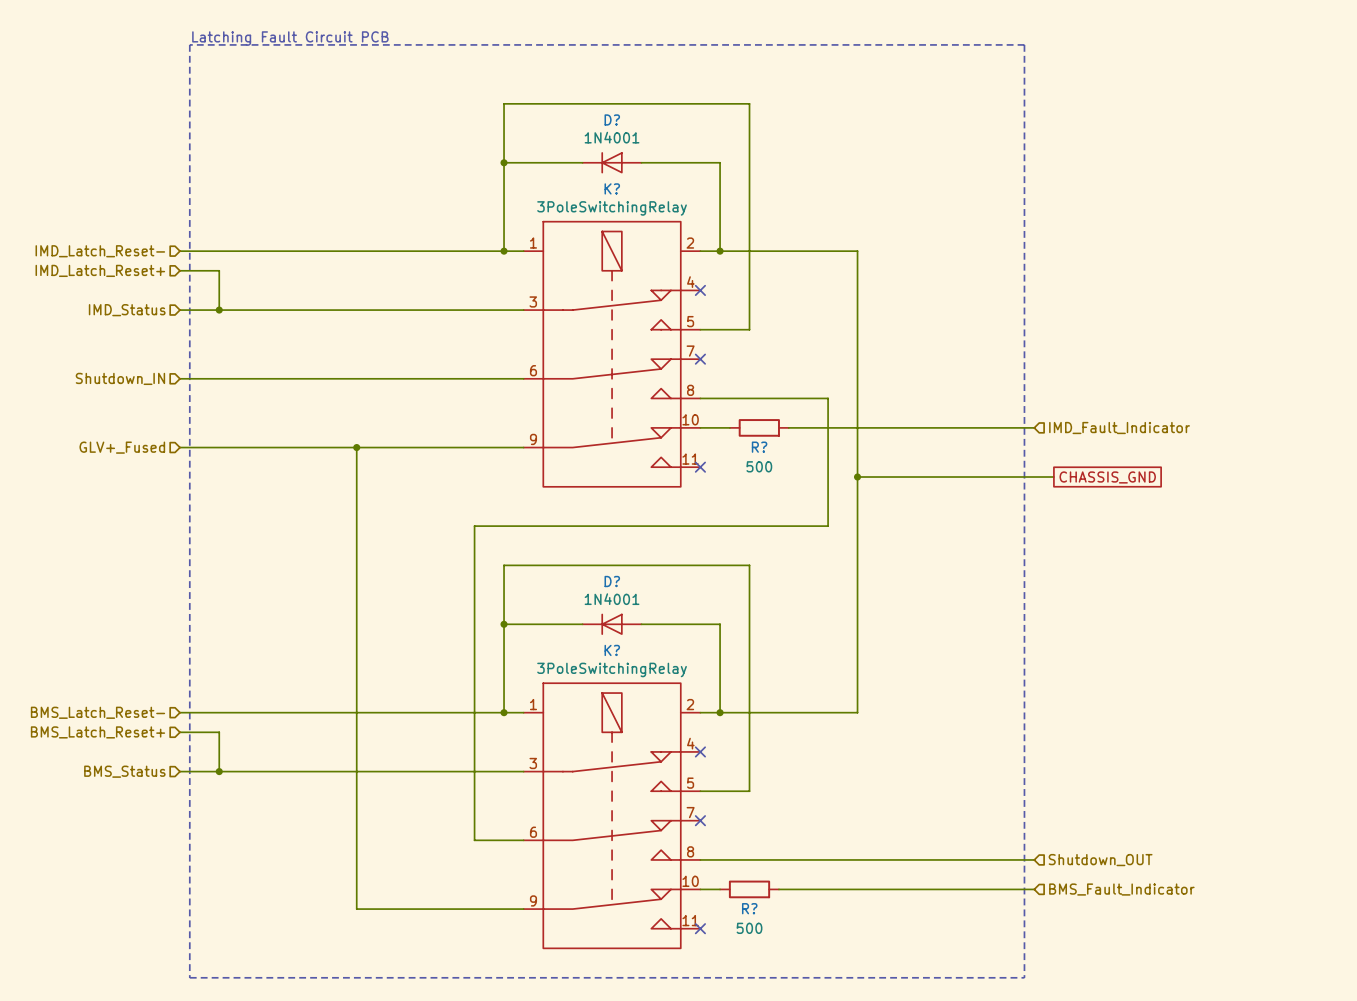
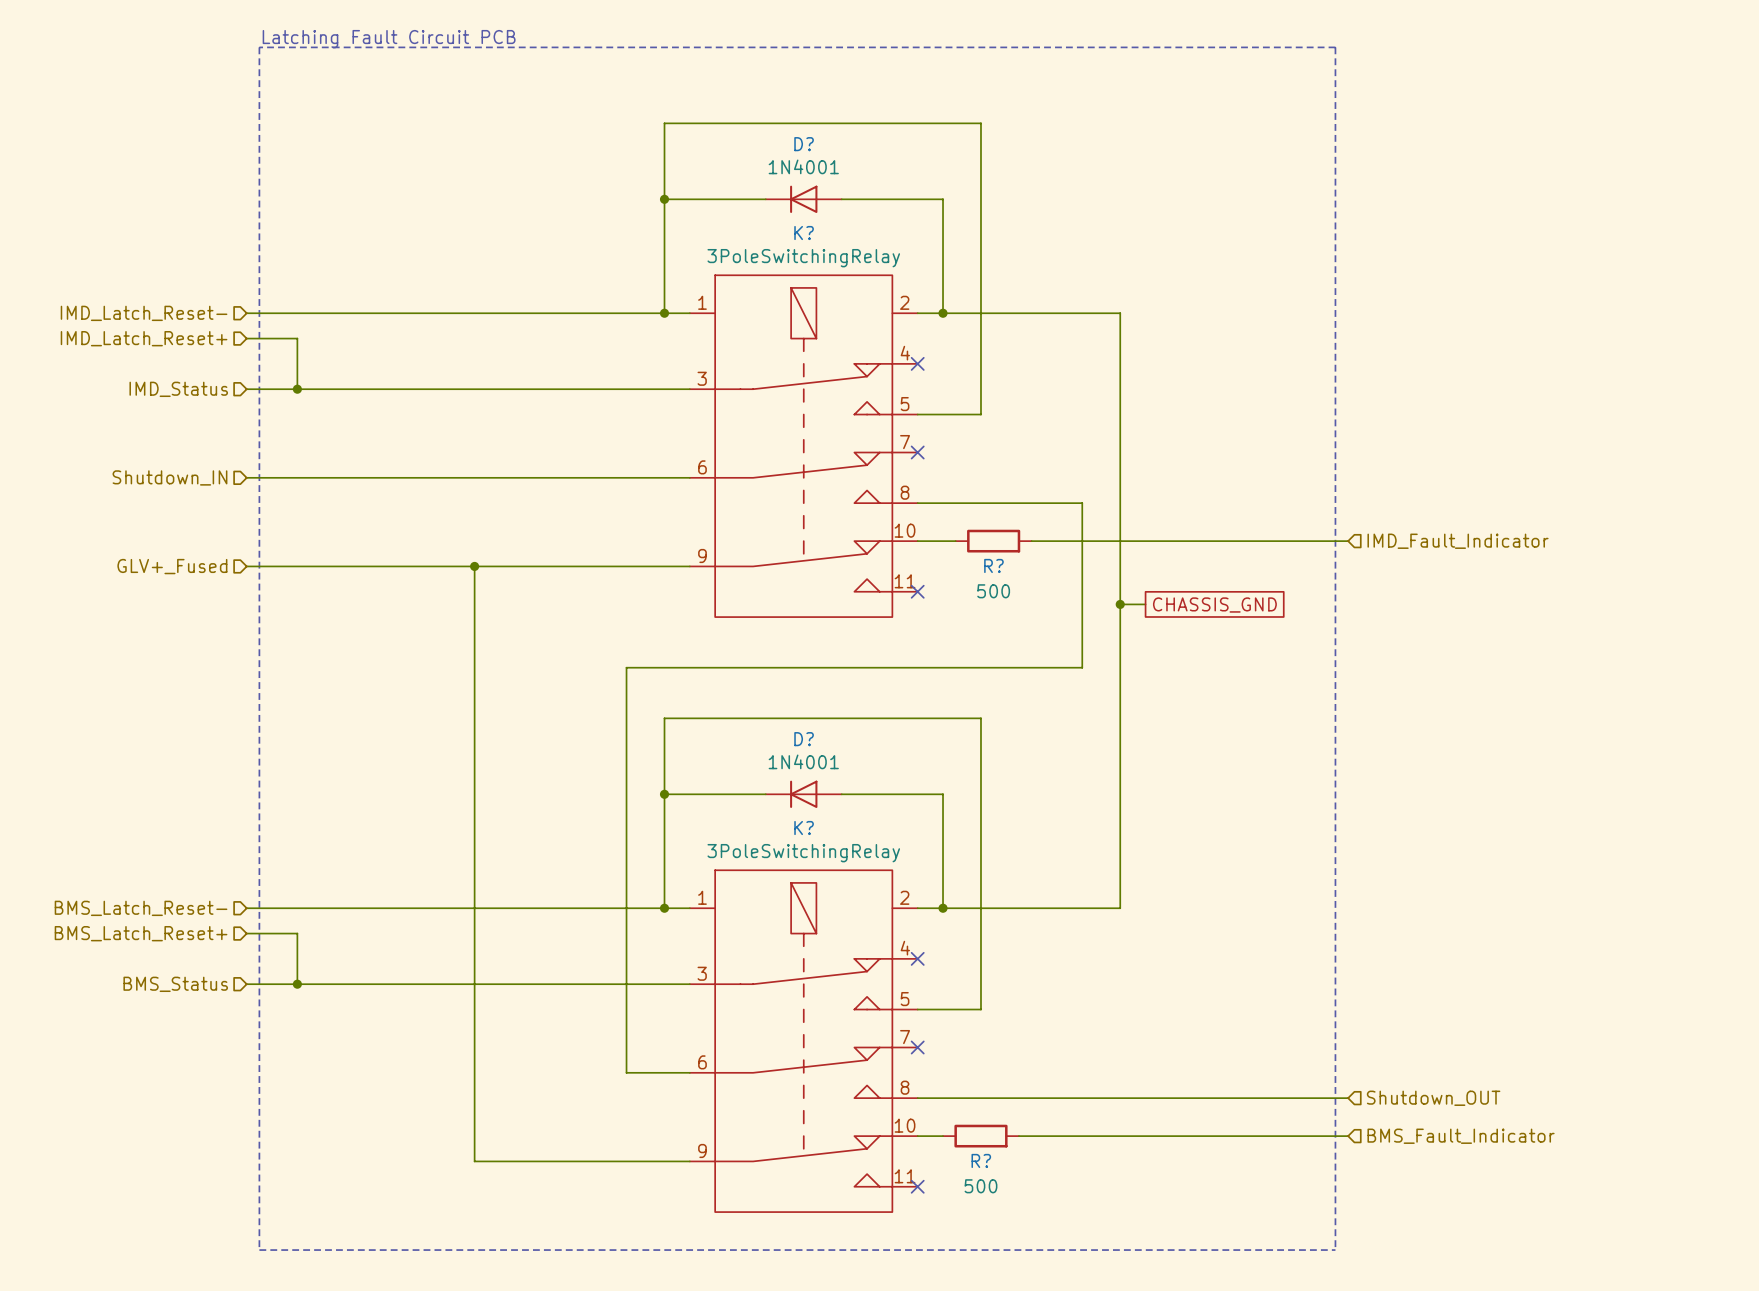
wire: (877, 477) (1053, 477) -> none
global label position: CHASSIS_GND (1107, 477) -> CHASSIS_GND (1214, 605)

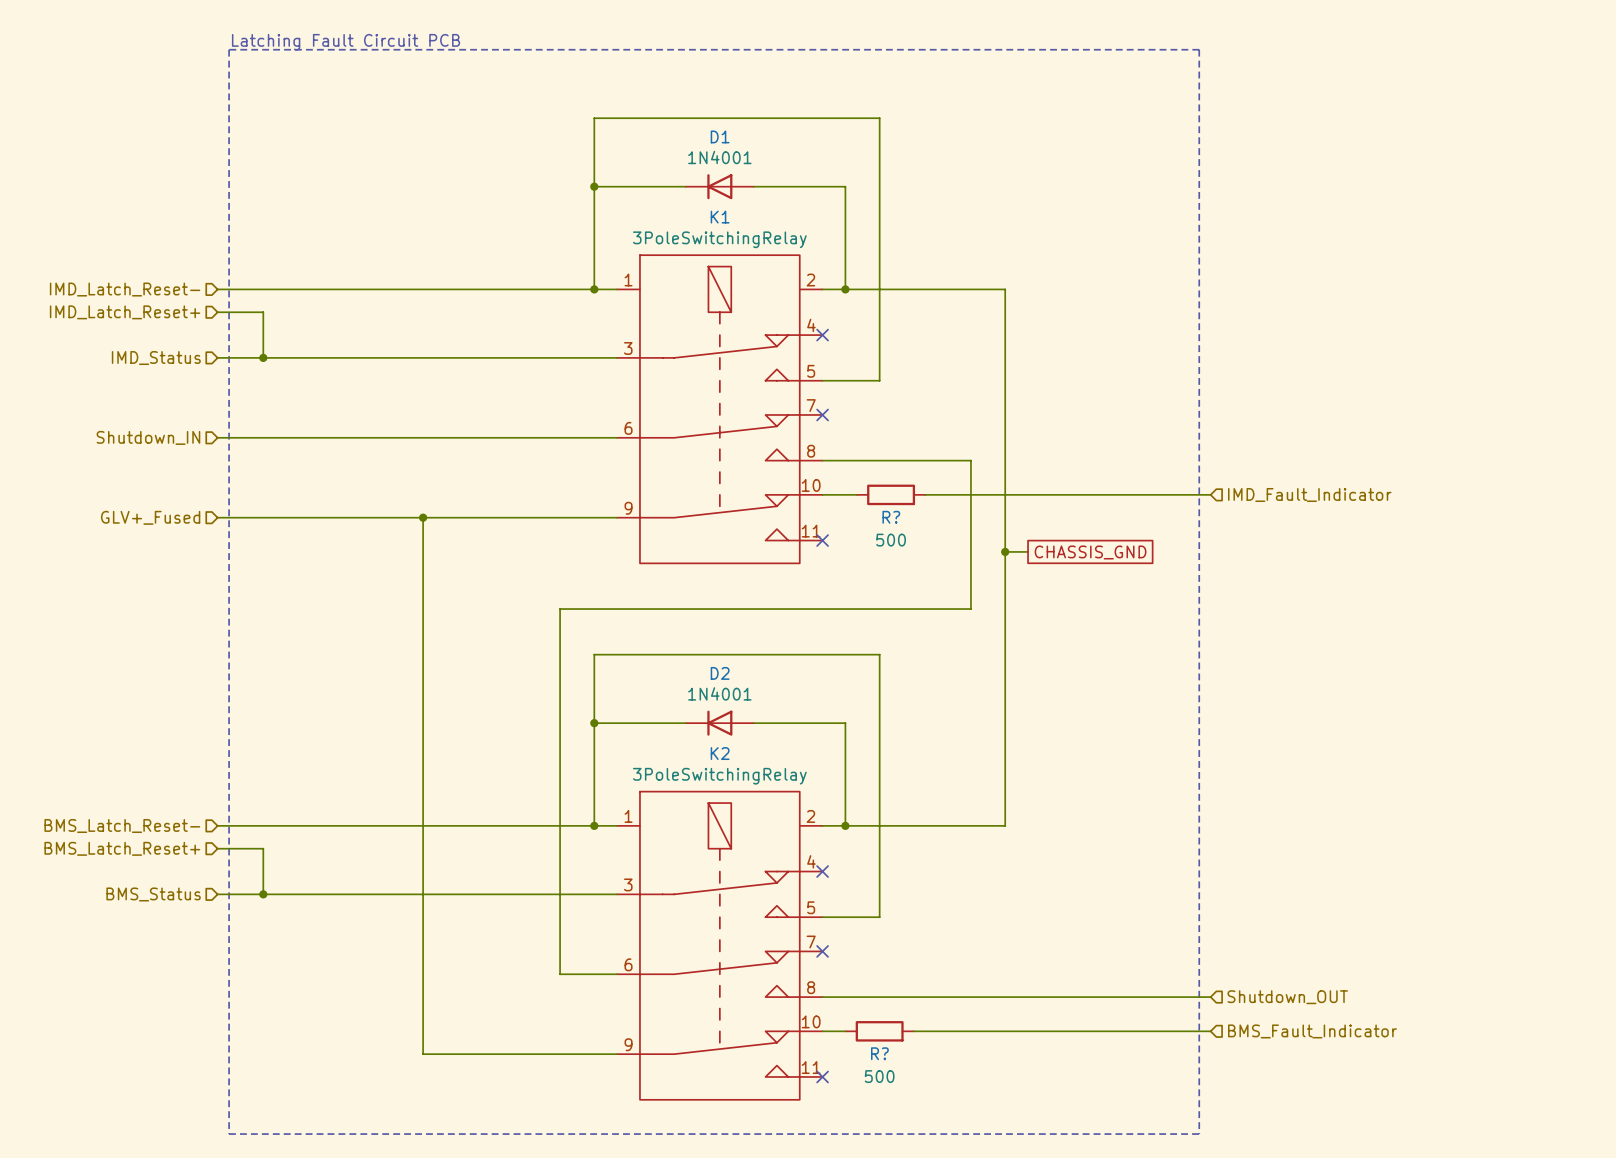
D?: 1N4001 (803, 199) -> none
D1: none -> 1N4001 (719, 186)
K? name: K? (804, 233) -> K1 (720, 217)
D?: 1N4001 (803, 794) -> none
D2: none -> 1N4001 (719, 723)
K? name: K? (804, 828) -> K2 (720, 753)

